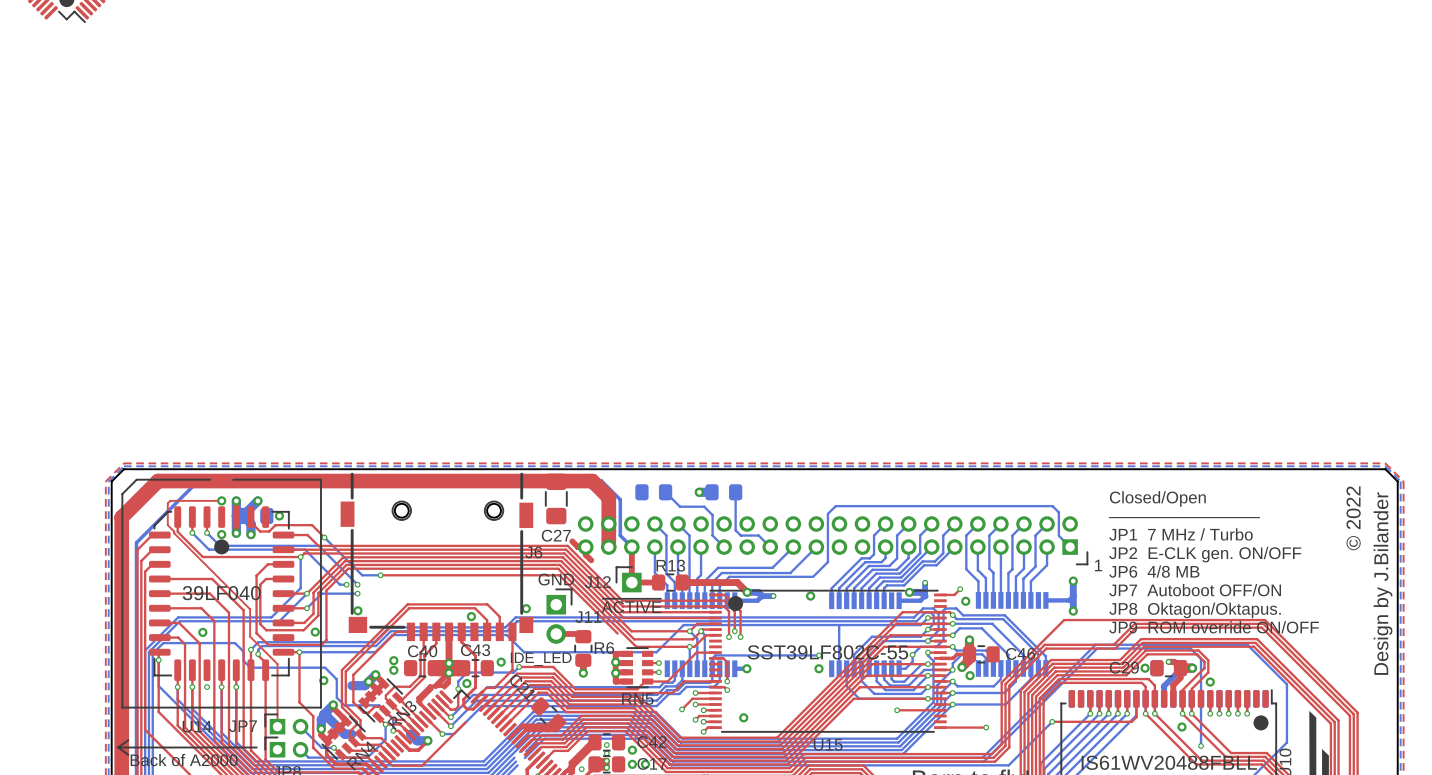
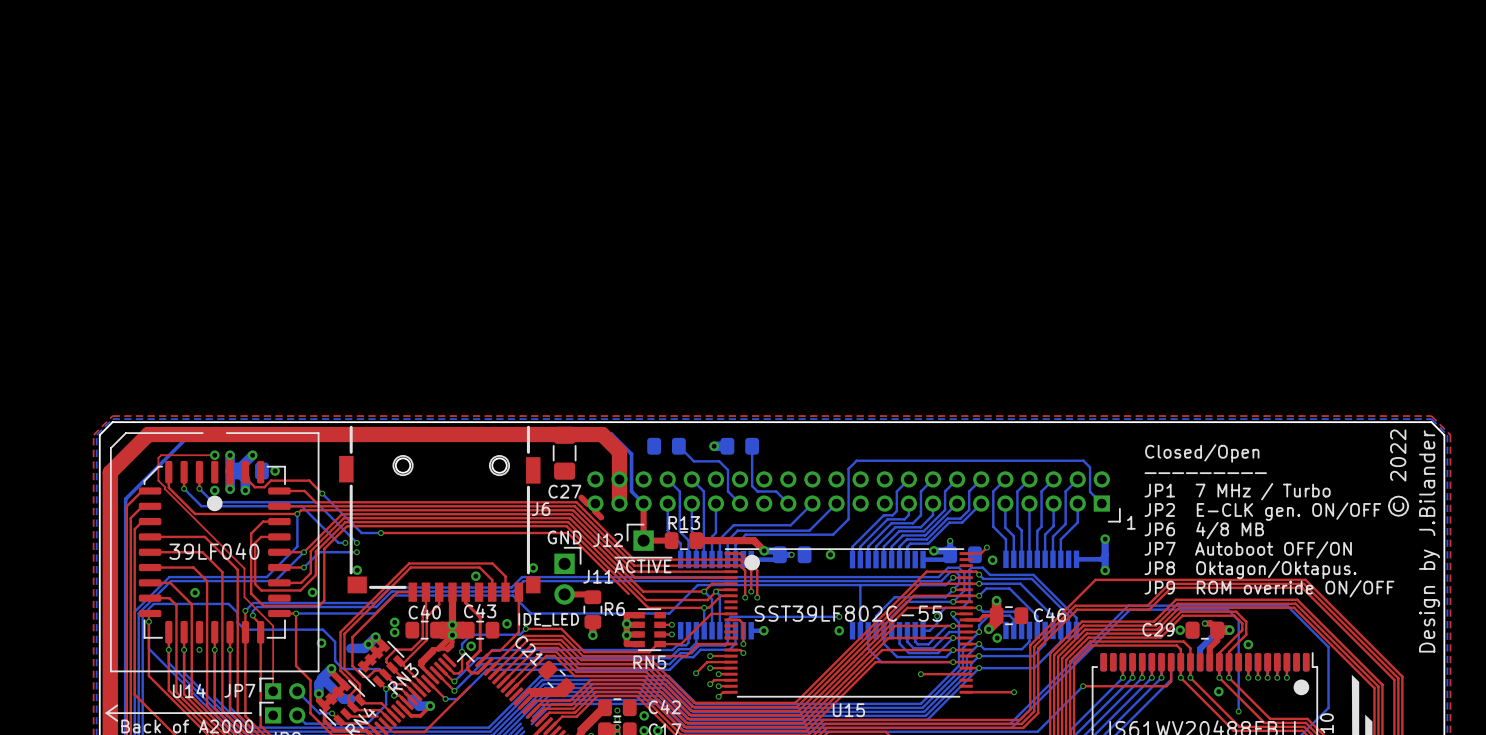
part: none -> (792, 554)
part: none -> (962, 554)
via: (743, 717) -> none

